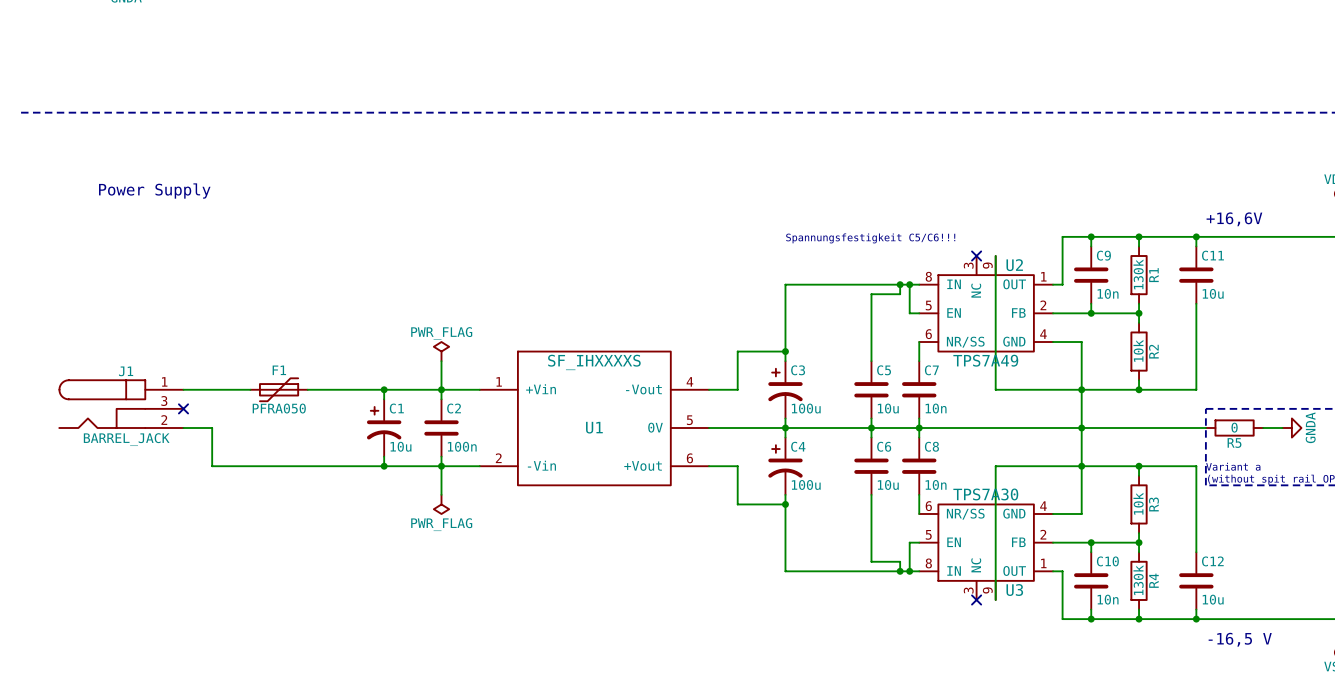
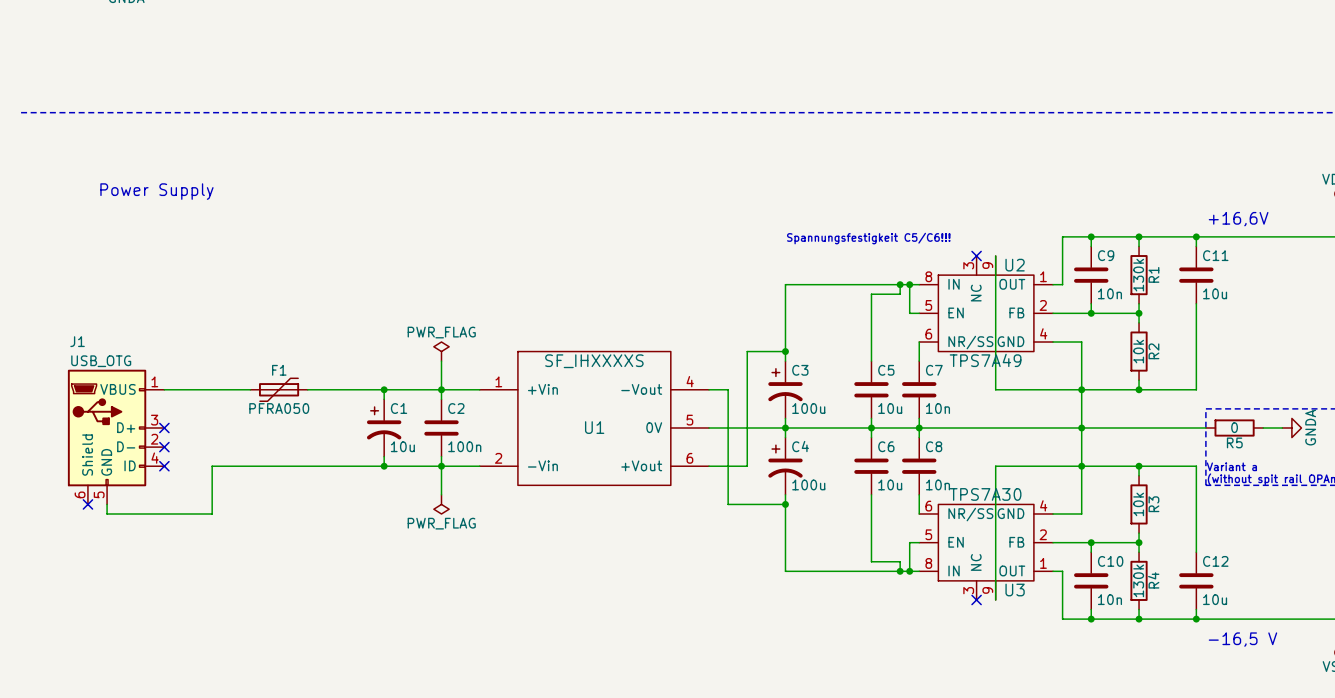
wire: (747, 351) (737, 351) (737, 389) (728, 389) -> (747, 351) (747, 466) (737, 466)
J1 name position: J1 (126, 371) -> J1 (77, 341)
J1 symbol: [59, 380, 184, 429] -> [67, 369, 165, 505]
no-connect mark: (183, 408) -> none
no-connect mark: none -> (164, 428)
wire: (183, 428) (212, 428) (212, 466) -> (107, 504) (107, 513) (212, 513) (212, 466)
J1 value: BARREL_JACK (126, 439) -> USB_OTG (101, 361)
no-connect mark: none -> (164, 447)
no-connect mark: none -> (164, 466)
wire: (737, 466) (737, 504) -> (728, 389) (728, 504) (737, 504)
no-connect mark: none -> (87, 504)

